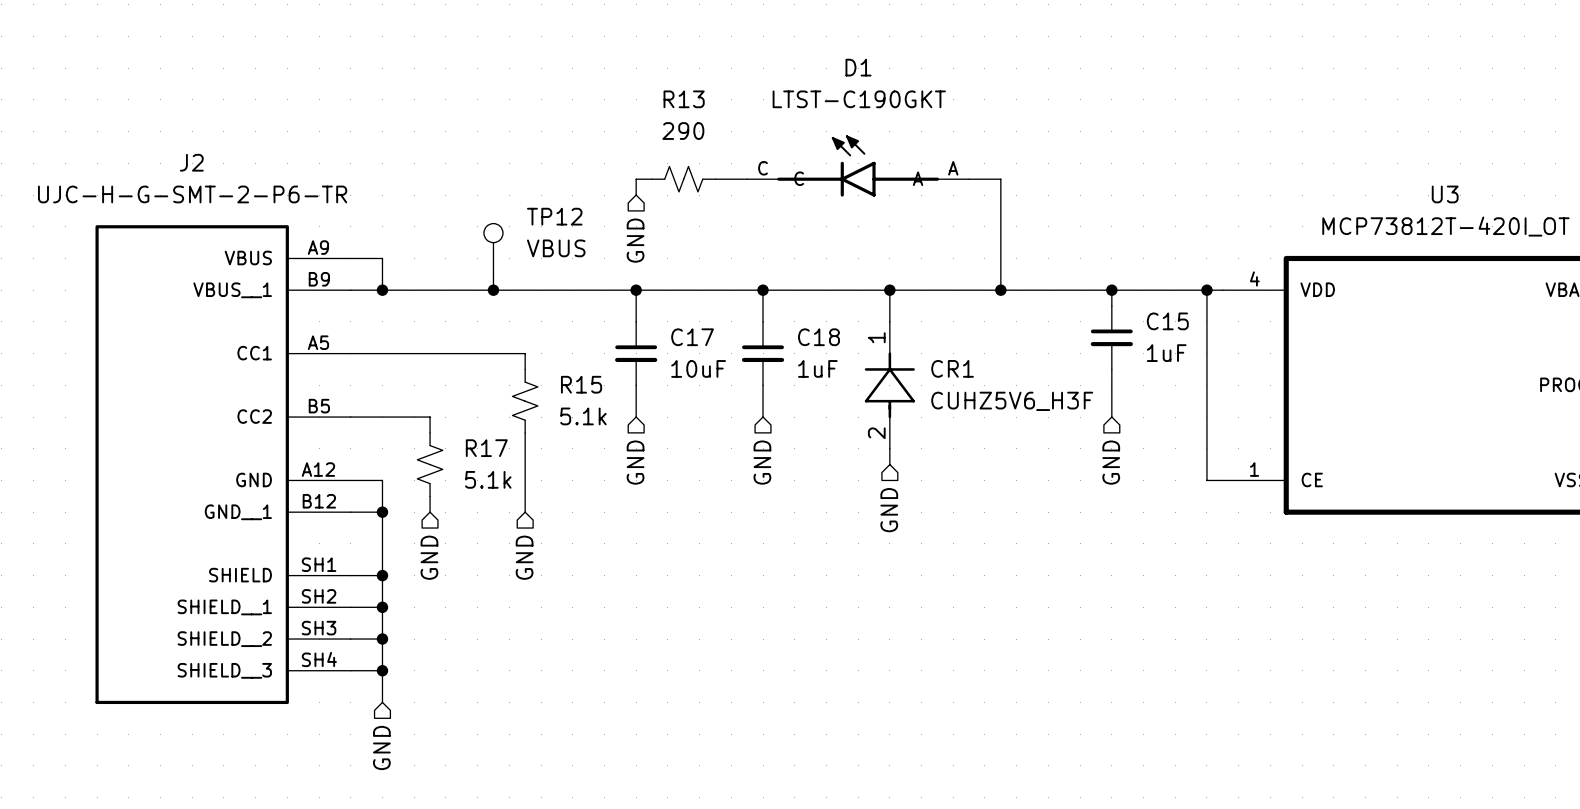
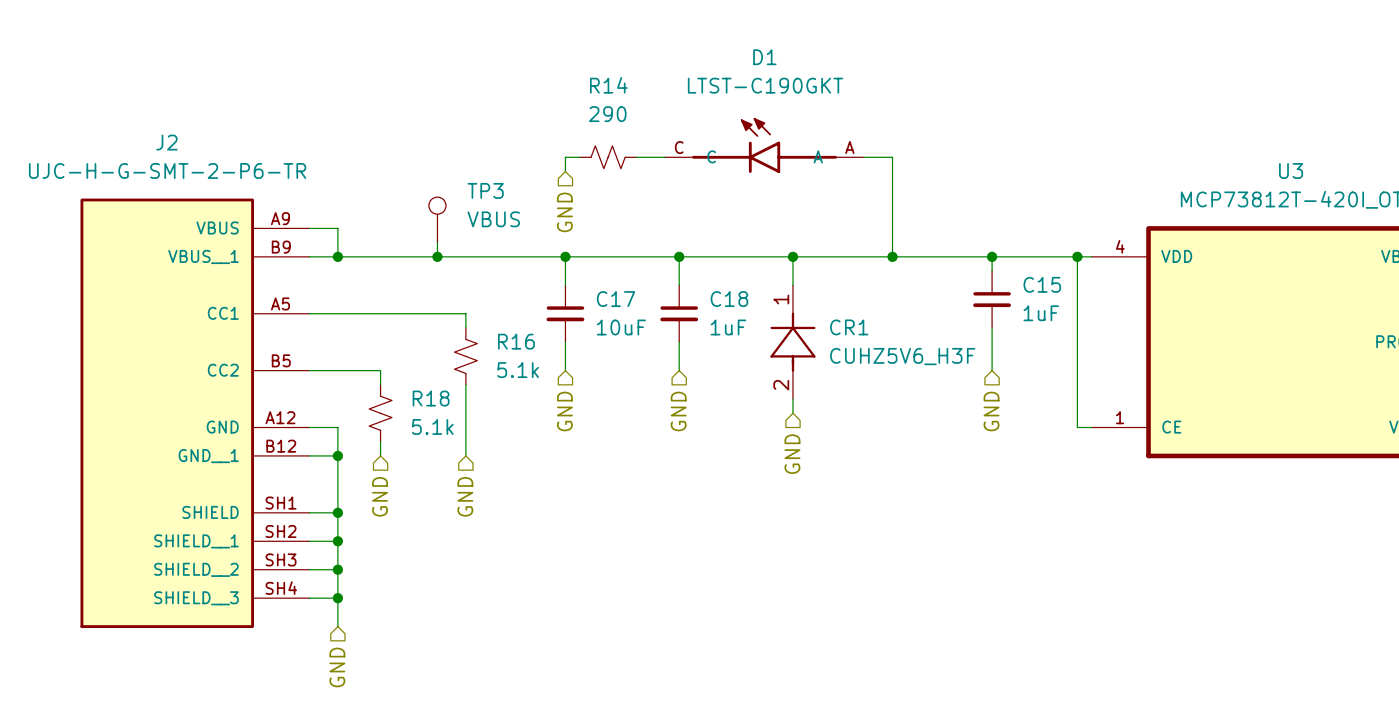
R13 name: R13 (684, 99) -> R14 (608, 85)
TP12 name: TP12 (554, 216) -> TP3 (485, 190)
R15 name: R15 (581, 384) -> R16 (516, 341)
R17 name: R17 (486, 448) -> R18 (431, 398)

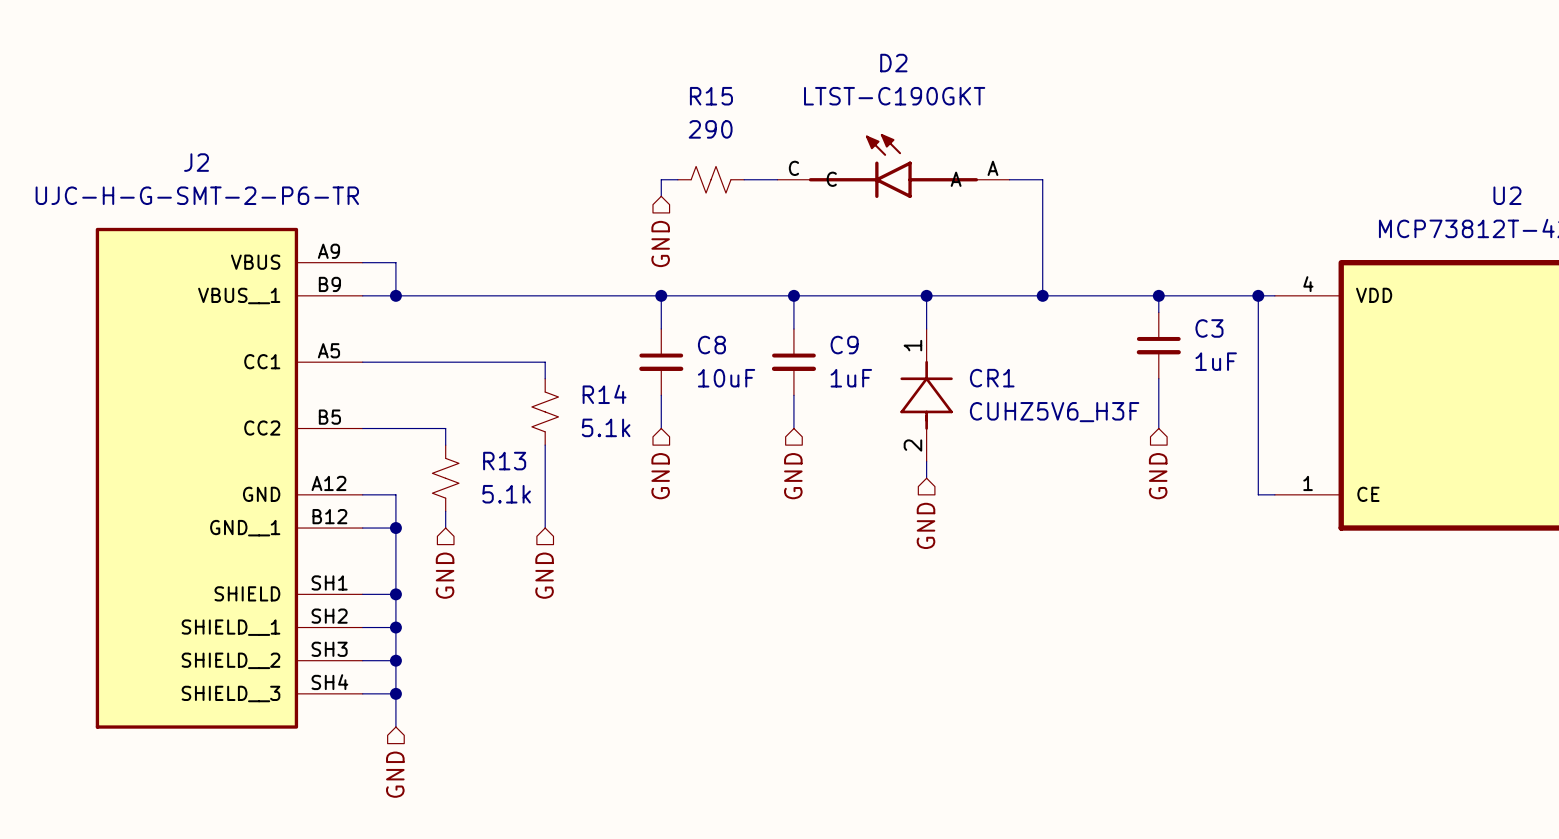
D1 name: D1 (764, 57) -> D2 (893, 63)
R14 name: R14 (608, 85) -> R15 (711, 96)
U3 name: U3 (1291, 171) -> U2 (1507, 195)
TP3: VBUS (437, 219) -> none
wire: (437, 242) (437, 256) -> none
junction: (437, 256) -> none
C15 name: C15 (1042, 284) -> C3 (1209, 328)
C17 name: C17 (615, 299) -> C8 (711, 345)
C18 name: C18 (729, 299) -> C9 (844, 345)
R16 name: R16 (516, 341) -> R14 (604, 394)
R18 name: R18 (431, 398) -> R13 (504, 461)

